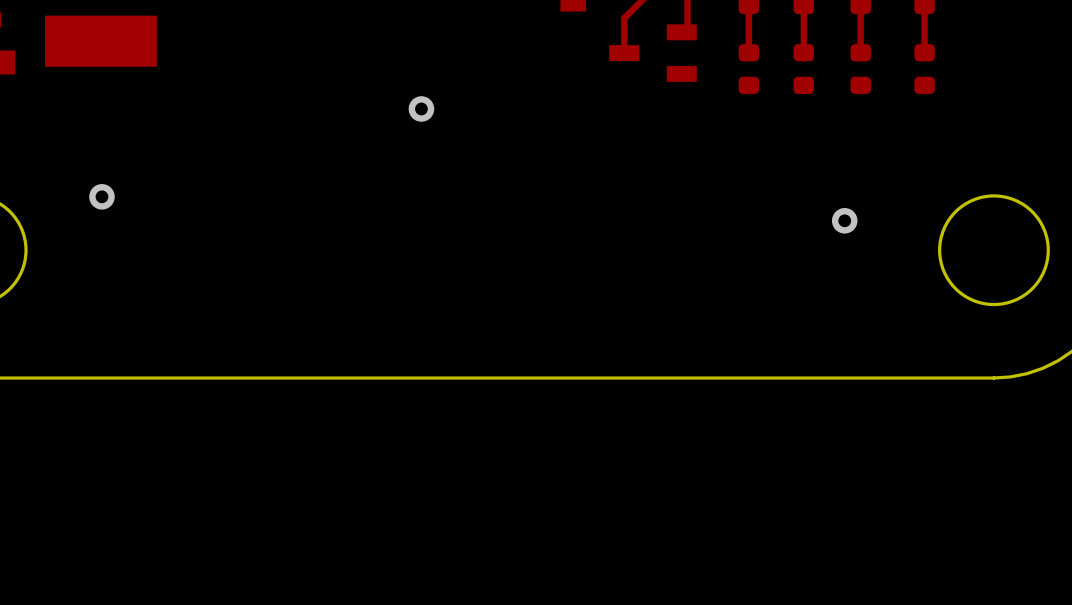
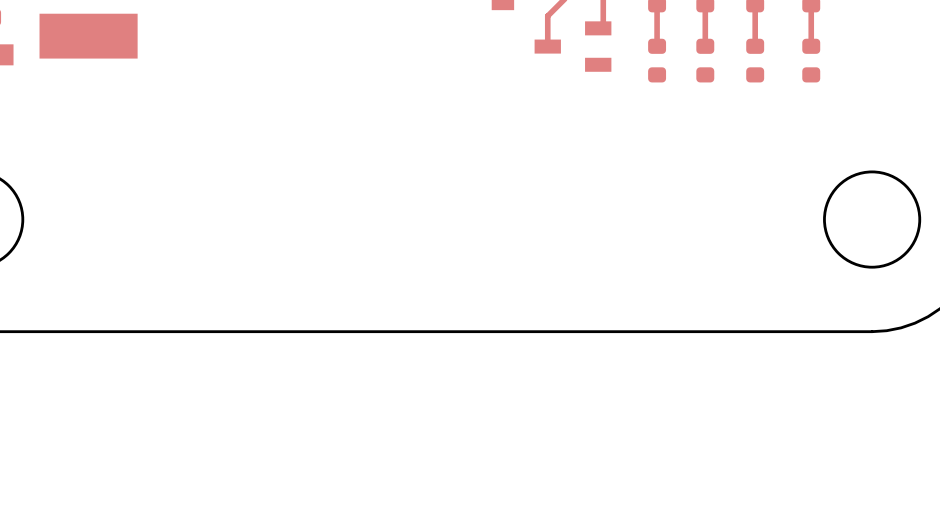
via: (421, 108) -> none
via: (101, 196) -> none
via: (844, 220) -> none

